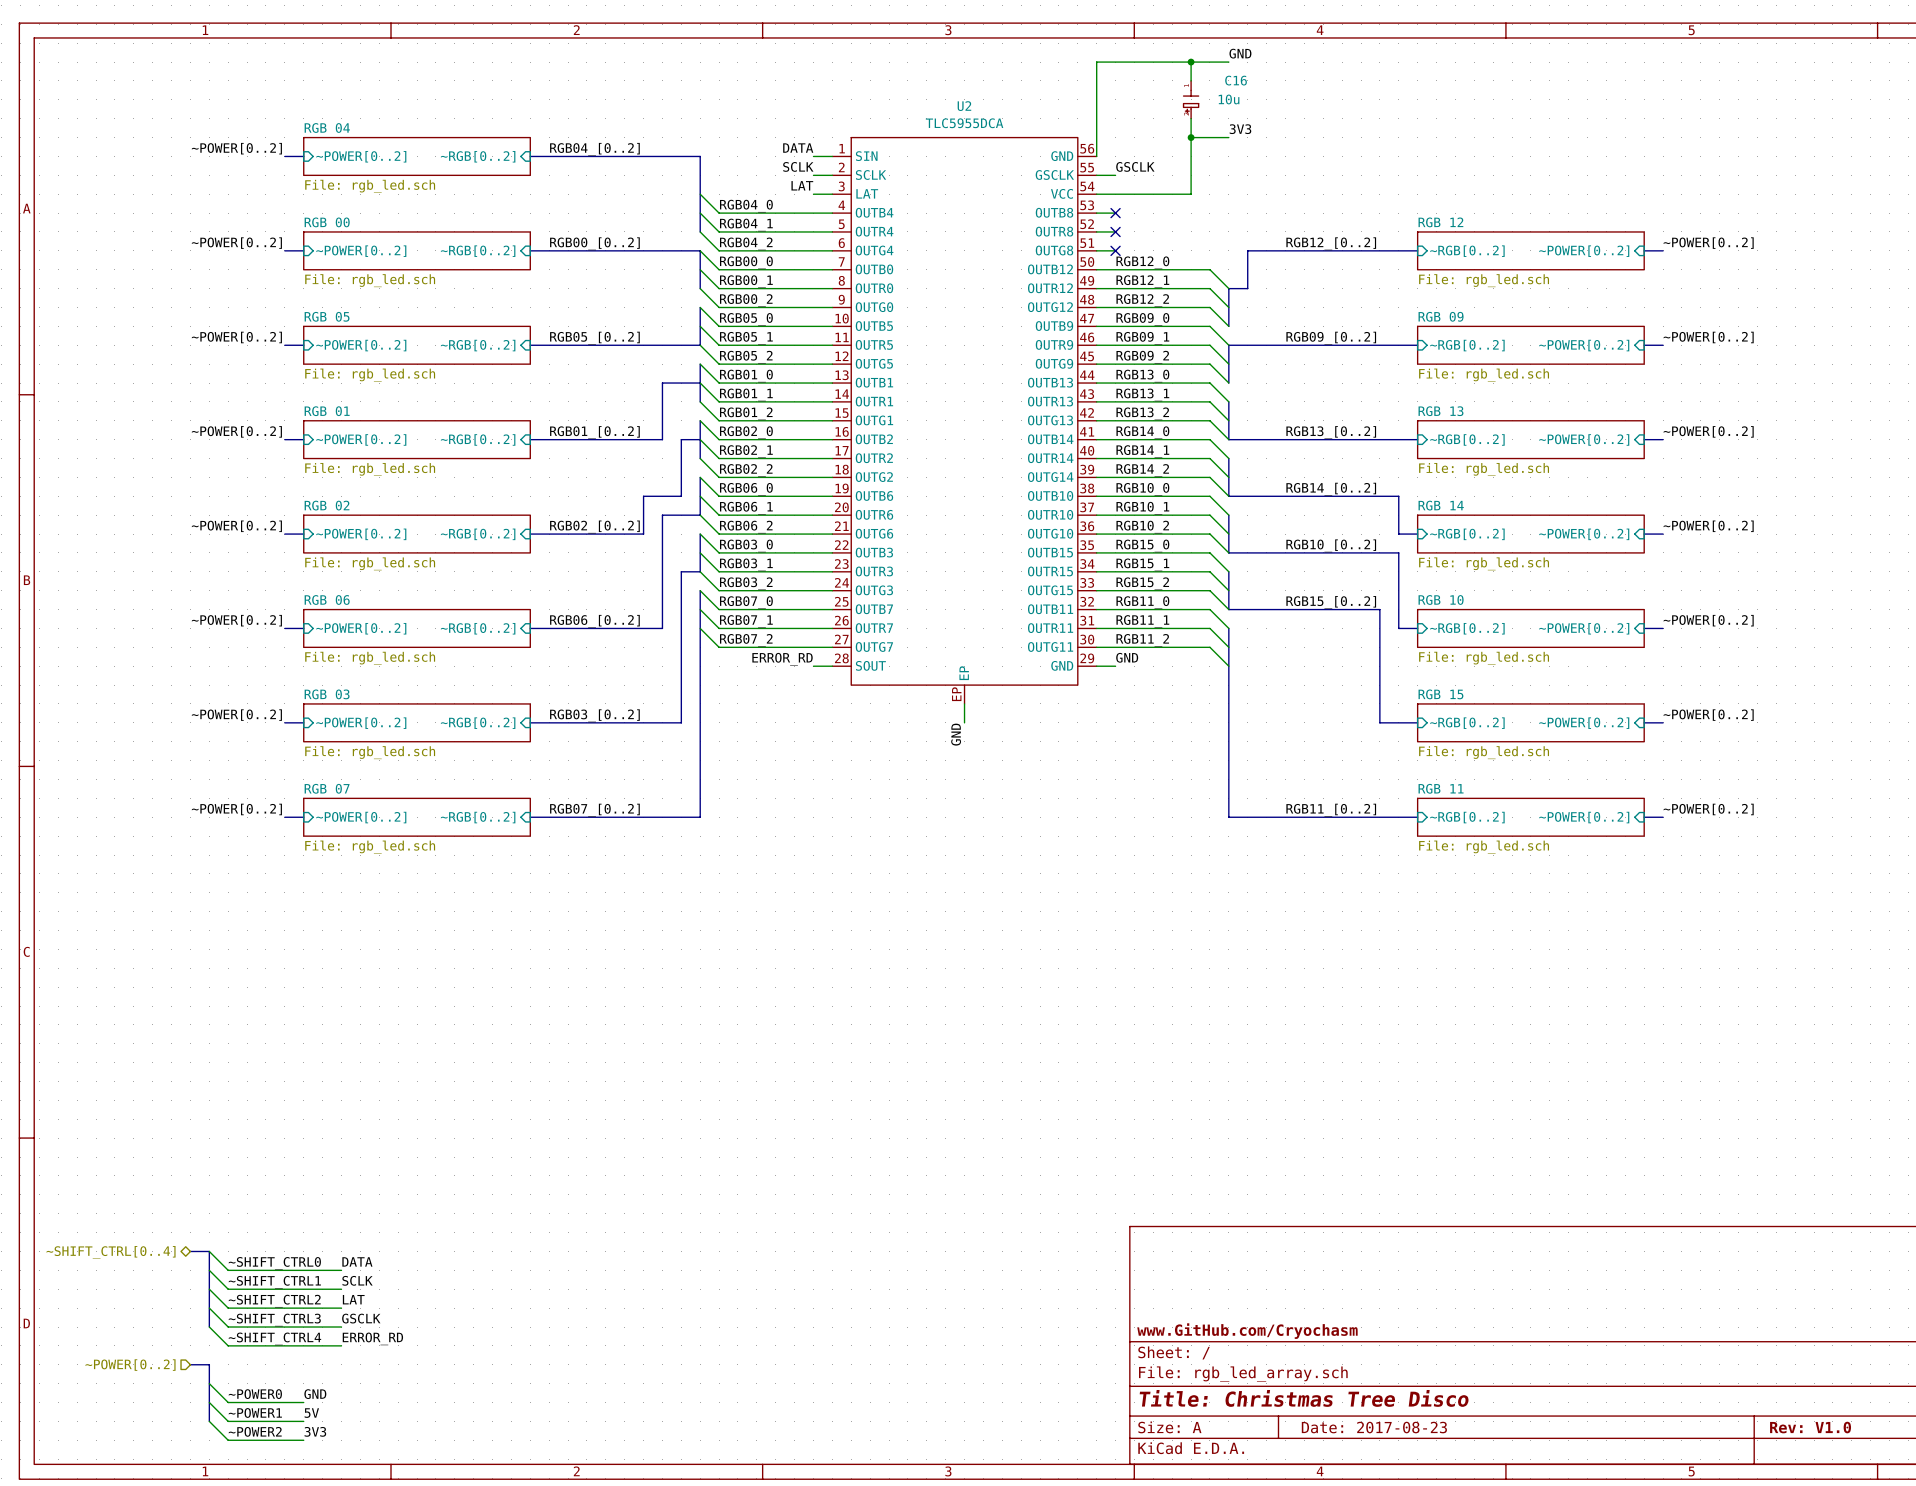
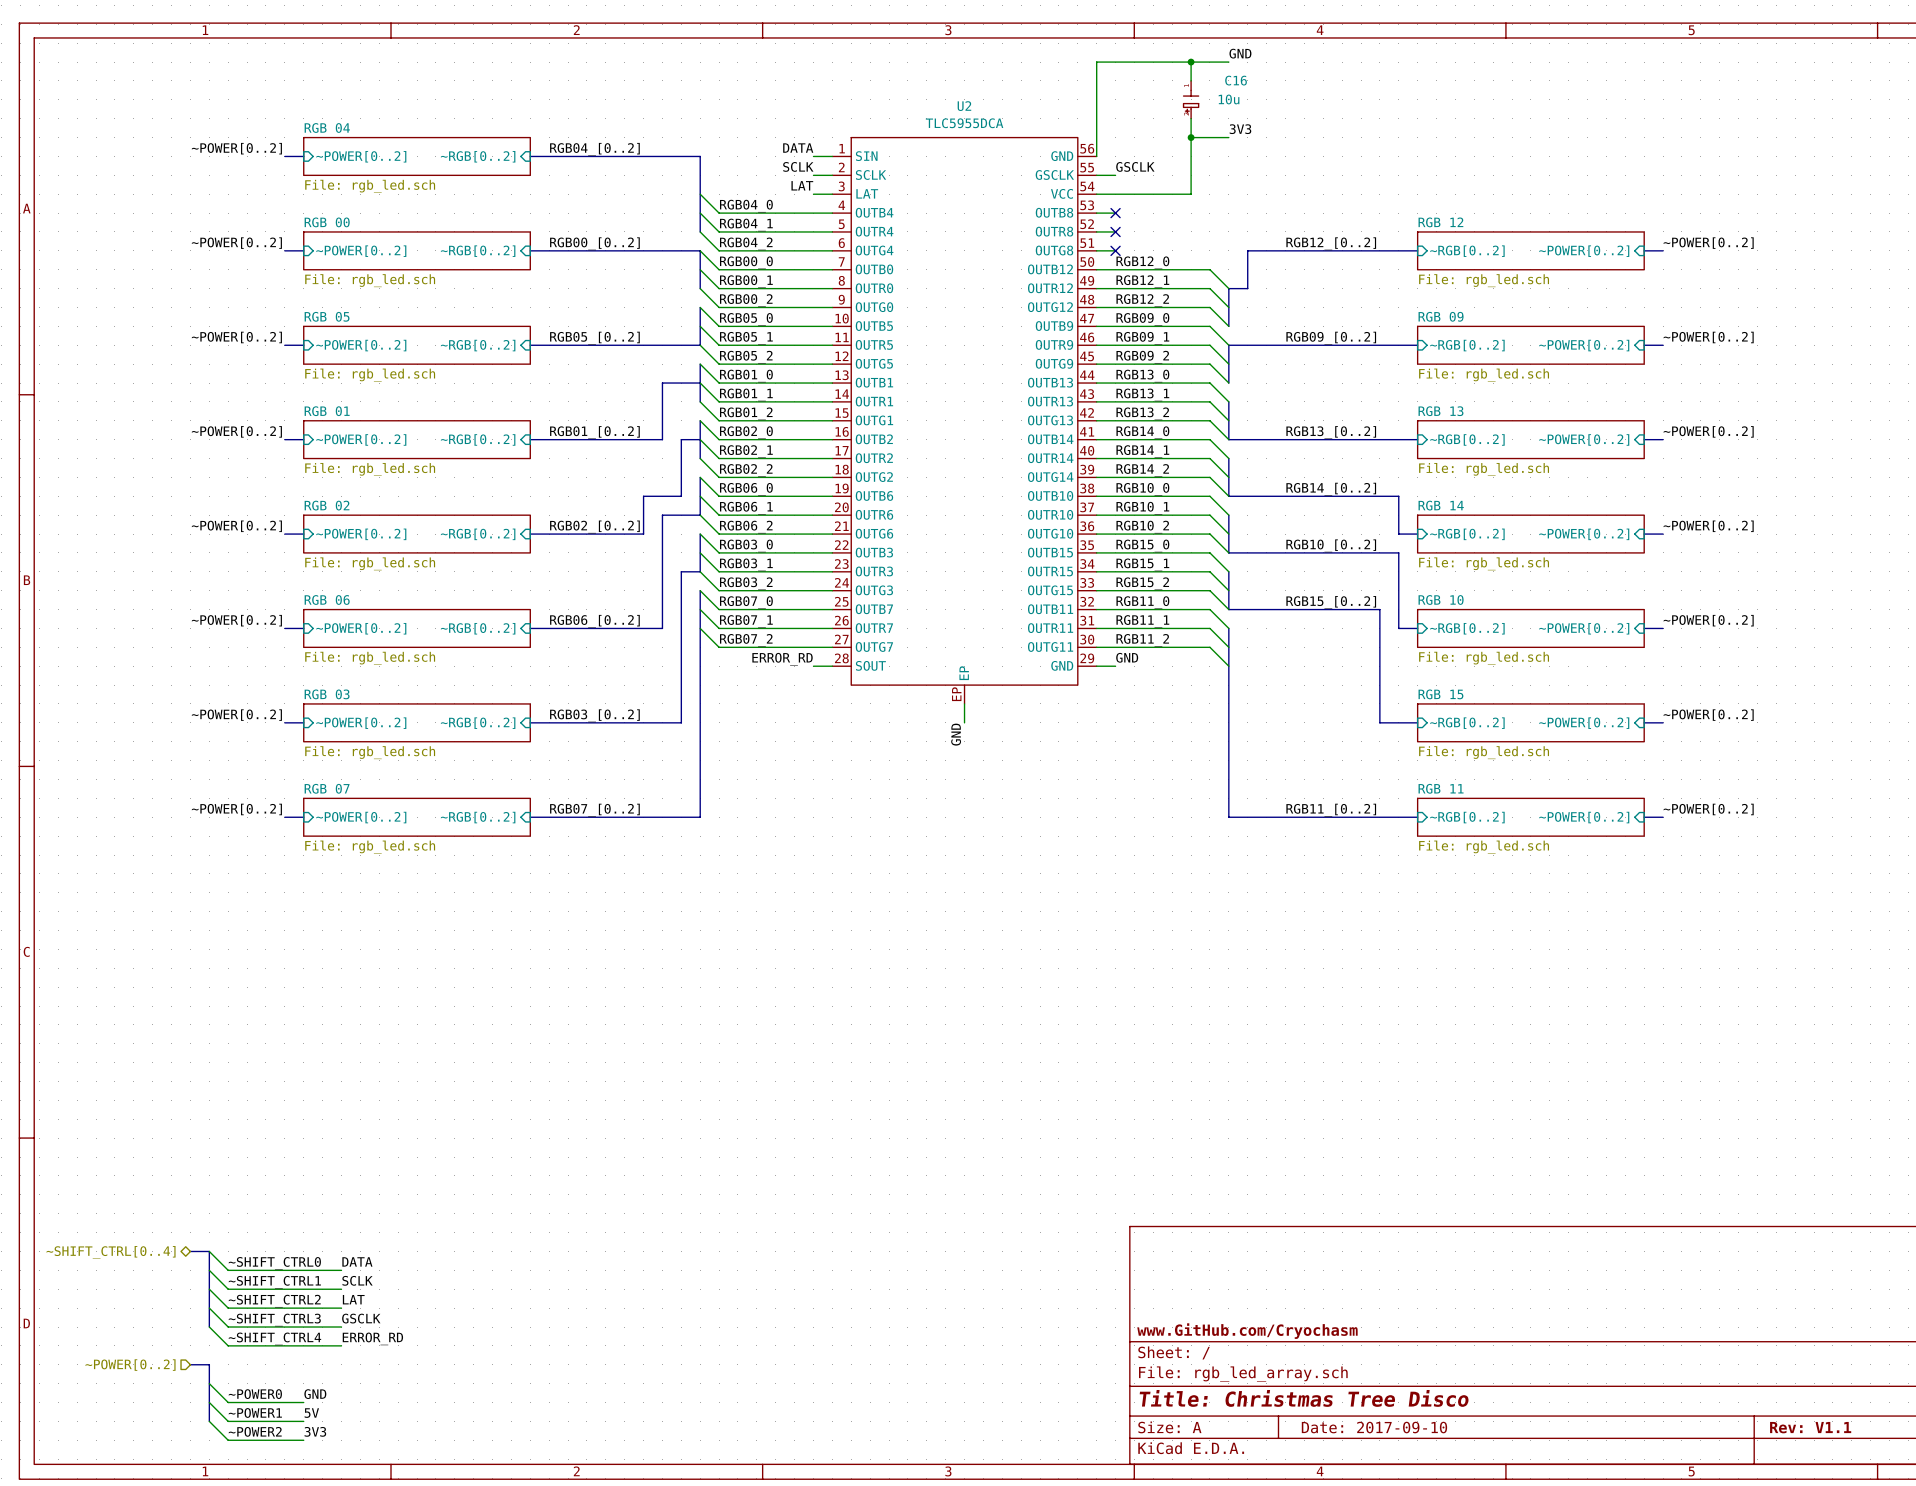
title block: Date: 2017-08-23 (1374, 1427) -> Date: 2017-09-10 (1374, 1427)
title block: Rev: V1.0 (1810, 1427) -> Rev: V1.1 (1810, 1427)

